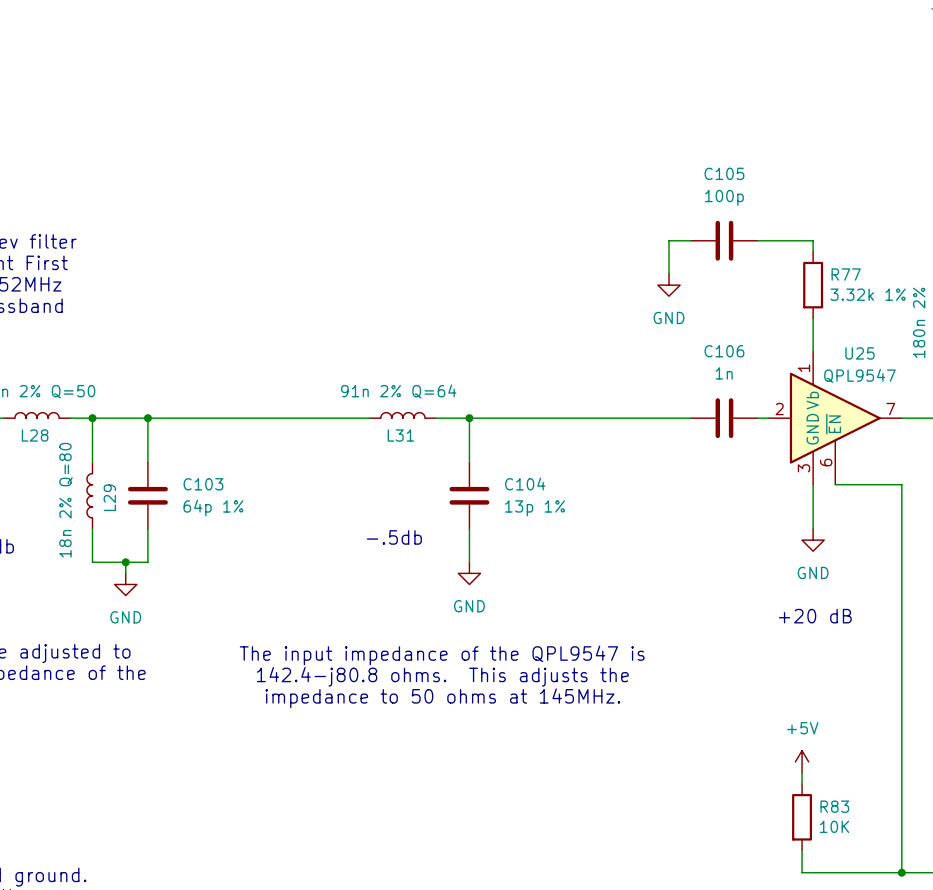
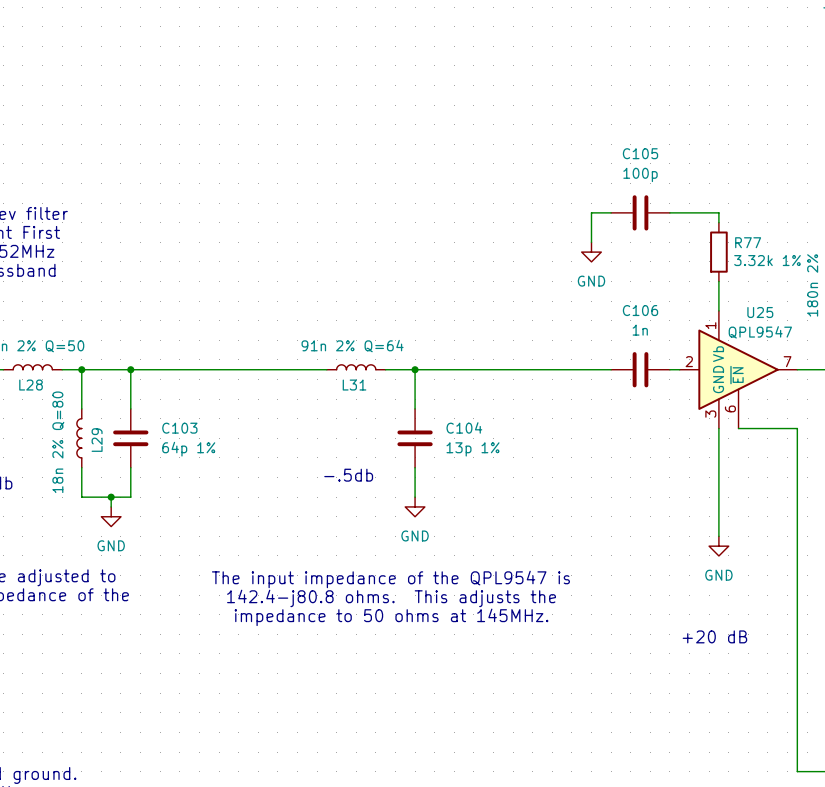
wire: none -> (718, 467) (718, 536)
power symbol position: GND (813, 540) -> GND (718, 546)
text position: +20 dB (815, 616) -> +20 dB (714, 636)
power symbol: +5V (802, 761) -> none
wire: (802, 772) (802, 784) -> none
R83: 10K (802, 817) -> none
wire: (802, 850) (802, 872) (901, 872) -> none
junction: (901, 872) -> none

